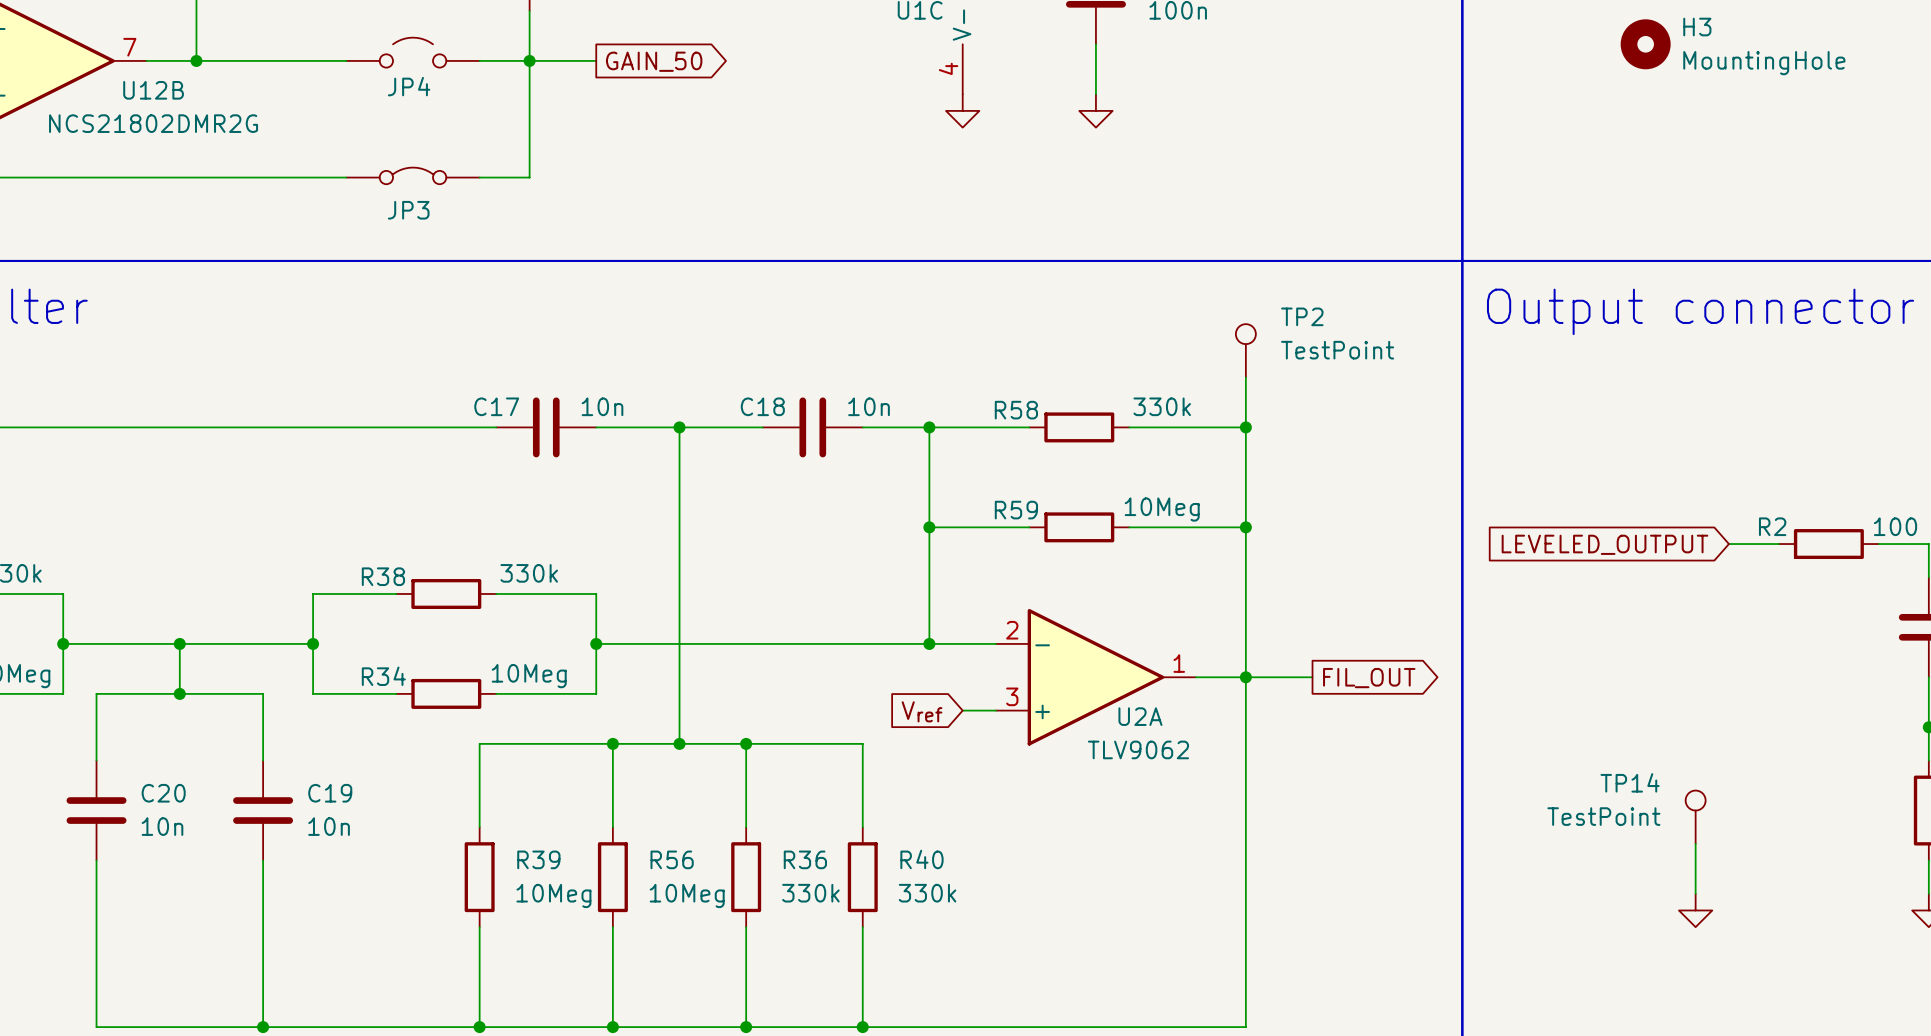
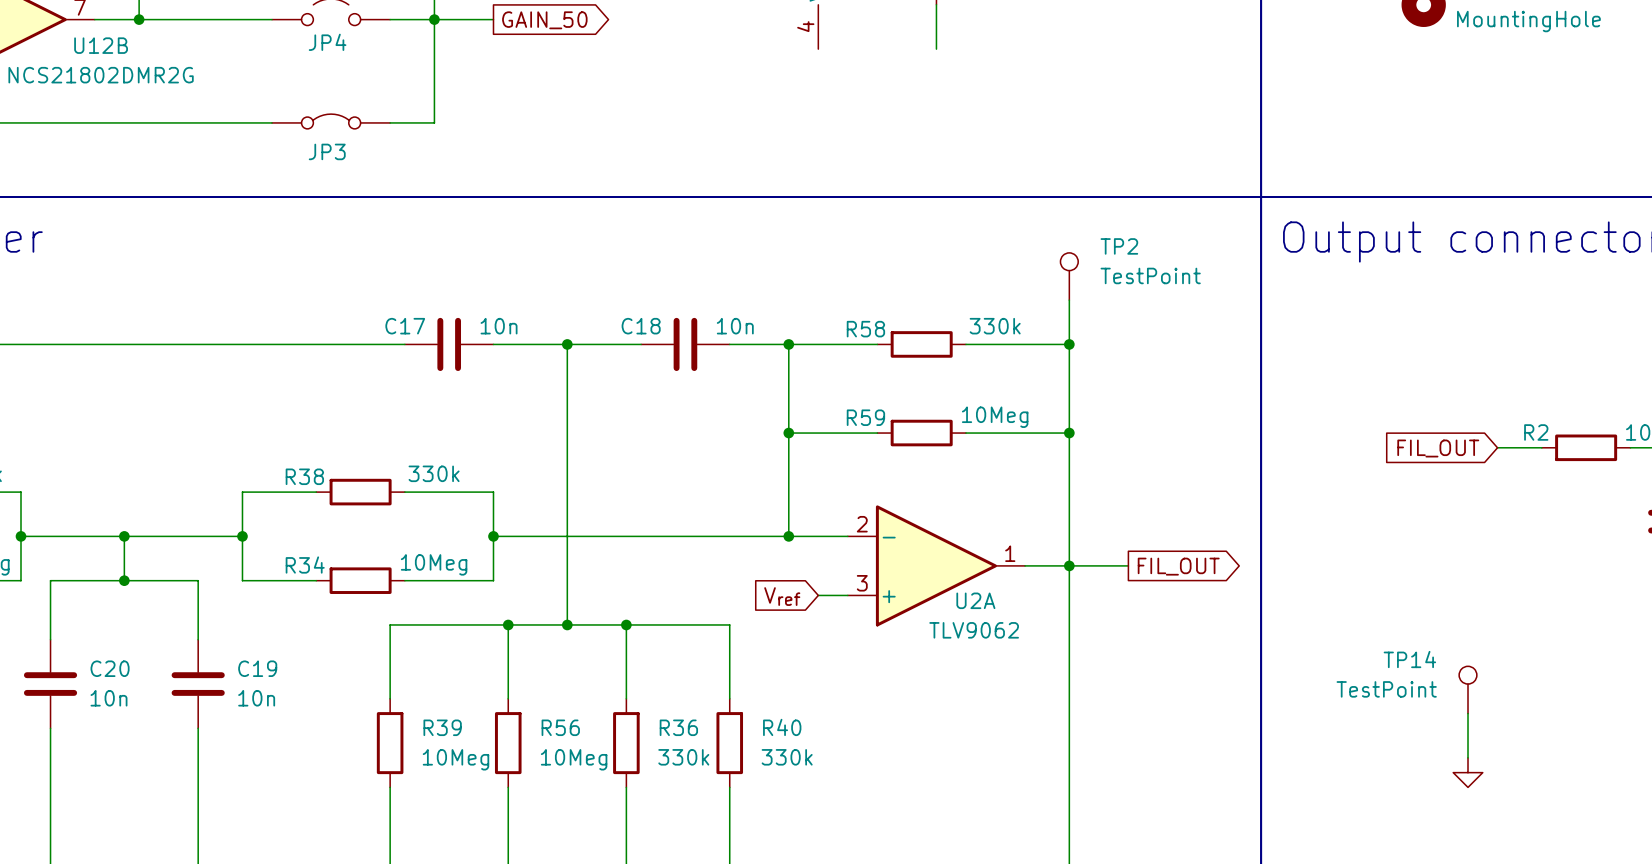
power symbol: (962, 110) -> none
power symbol: (1095, 110) -> none
global label: LEVELED_OUTPUT (1604, 544) -> FIL_OUT (1438, 448)

